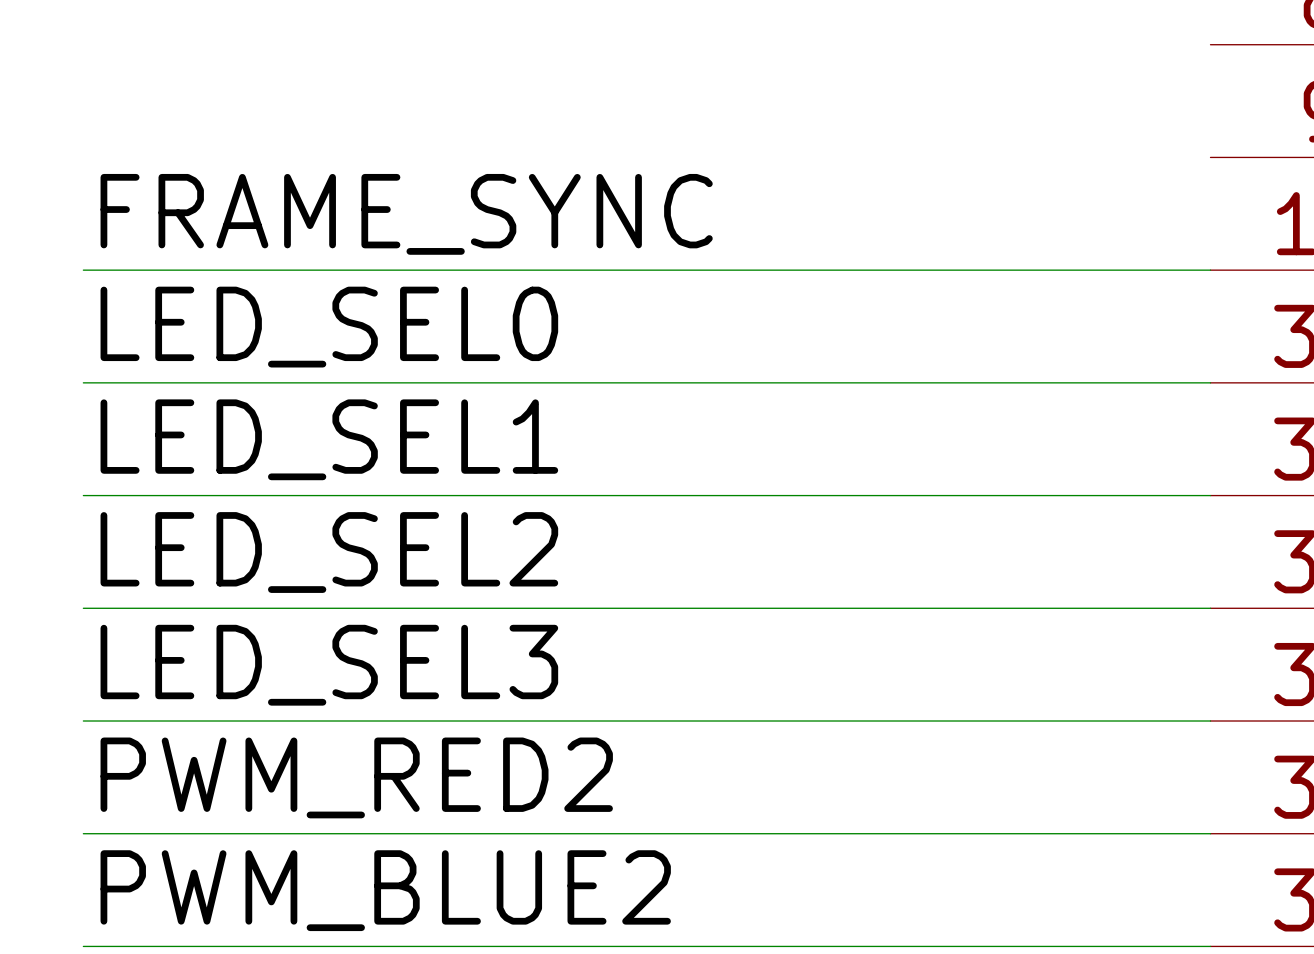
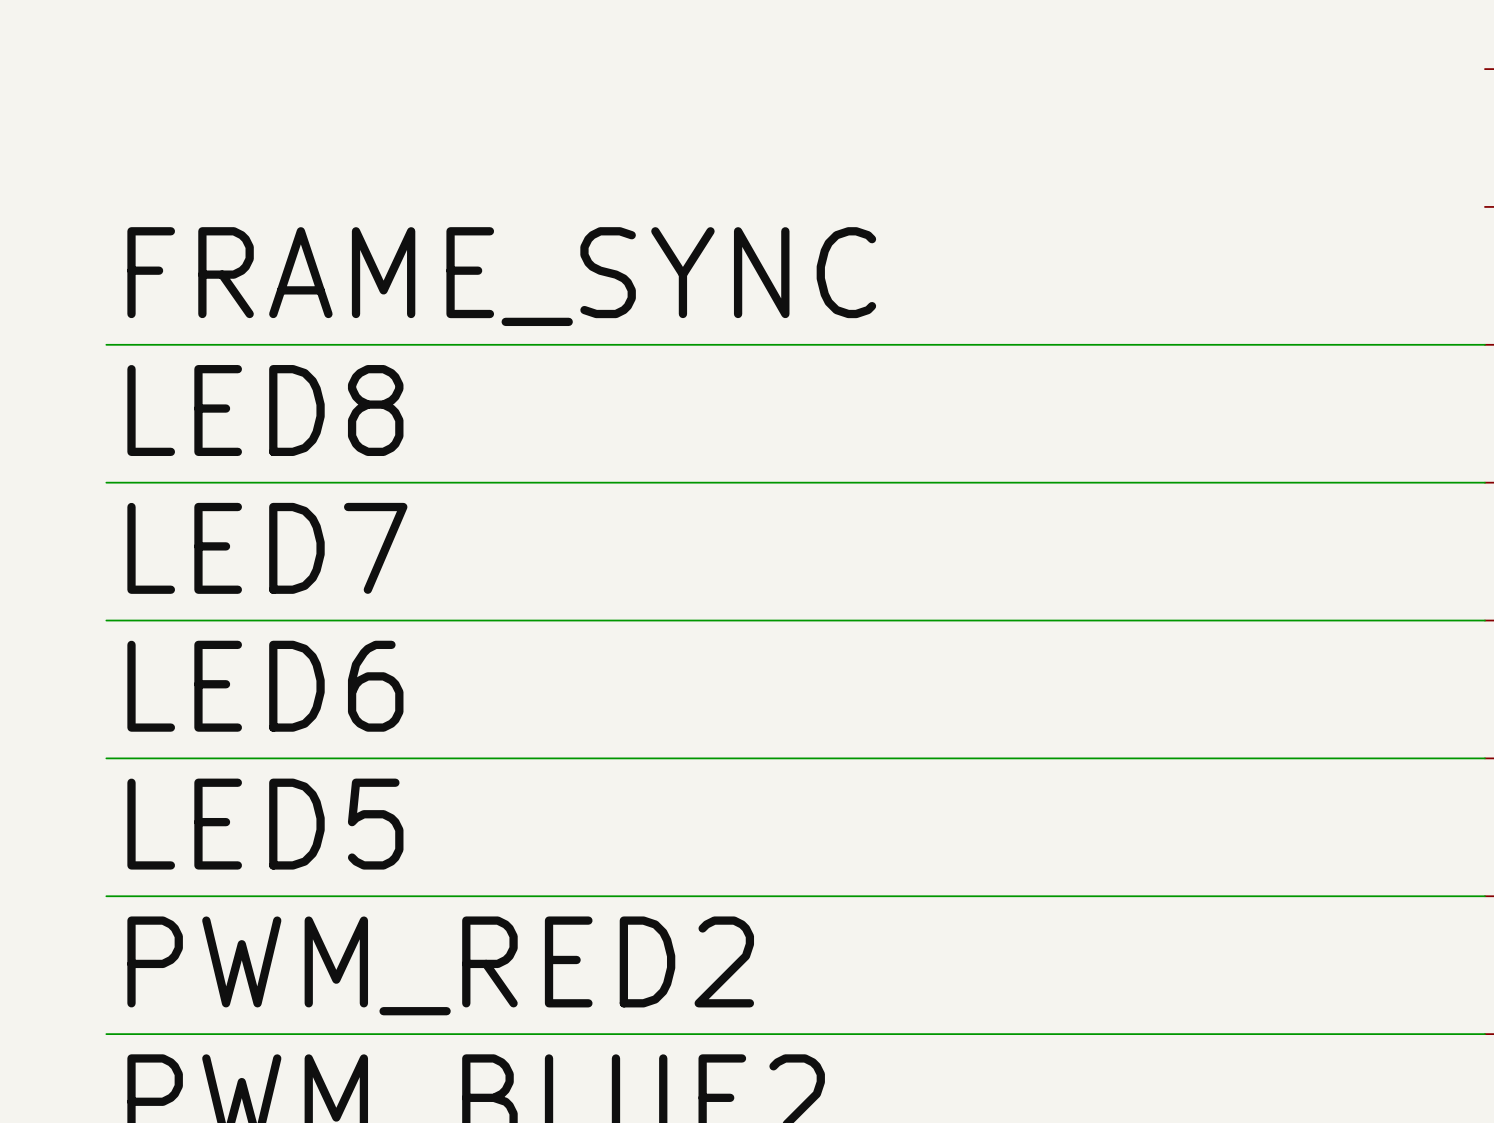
label: LED_SEL0 (329, 327) -> LED8 (265, 410)
label: LED_SEL1 (329, 439) -> LED7 (267, 548)
label: LED_SEL2 (329, 552) -> LED6 (265, 686)
label: LED_SEL3 (329, 665) -> LED5 (265, 824)

